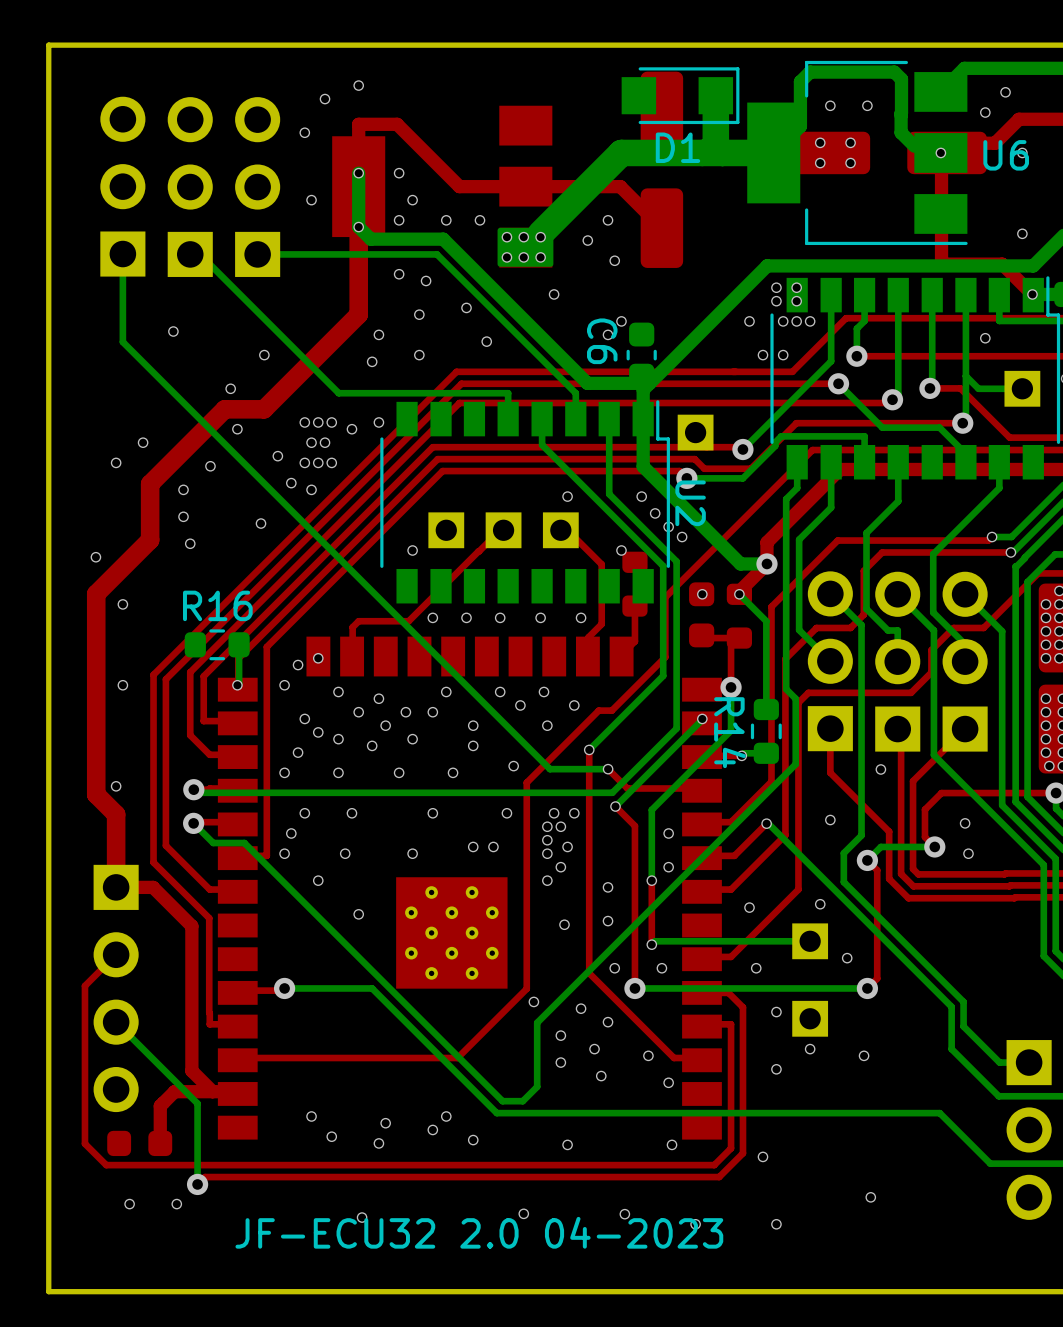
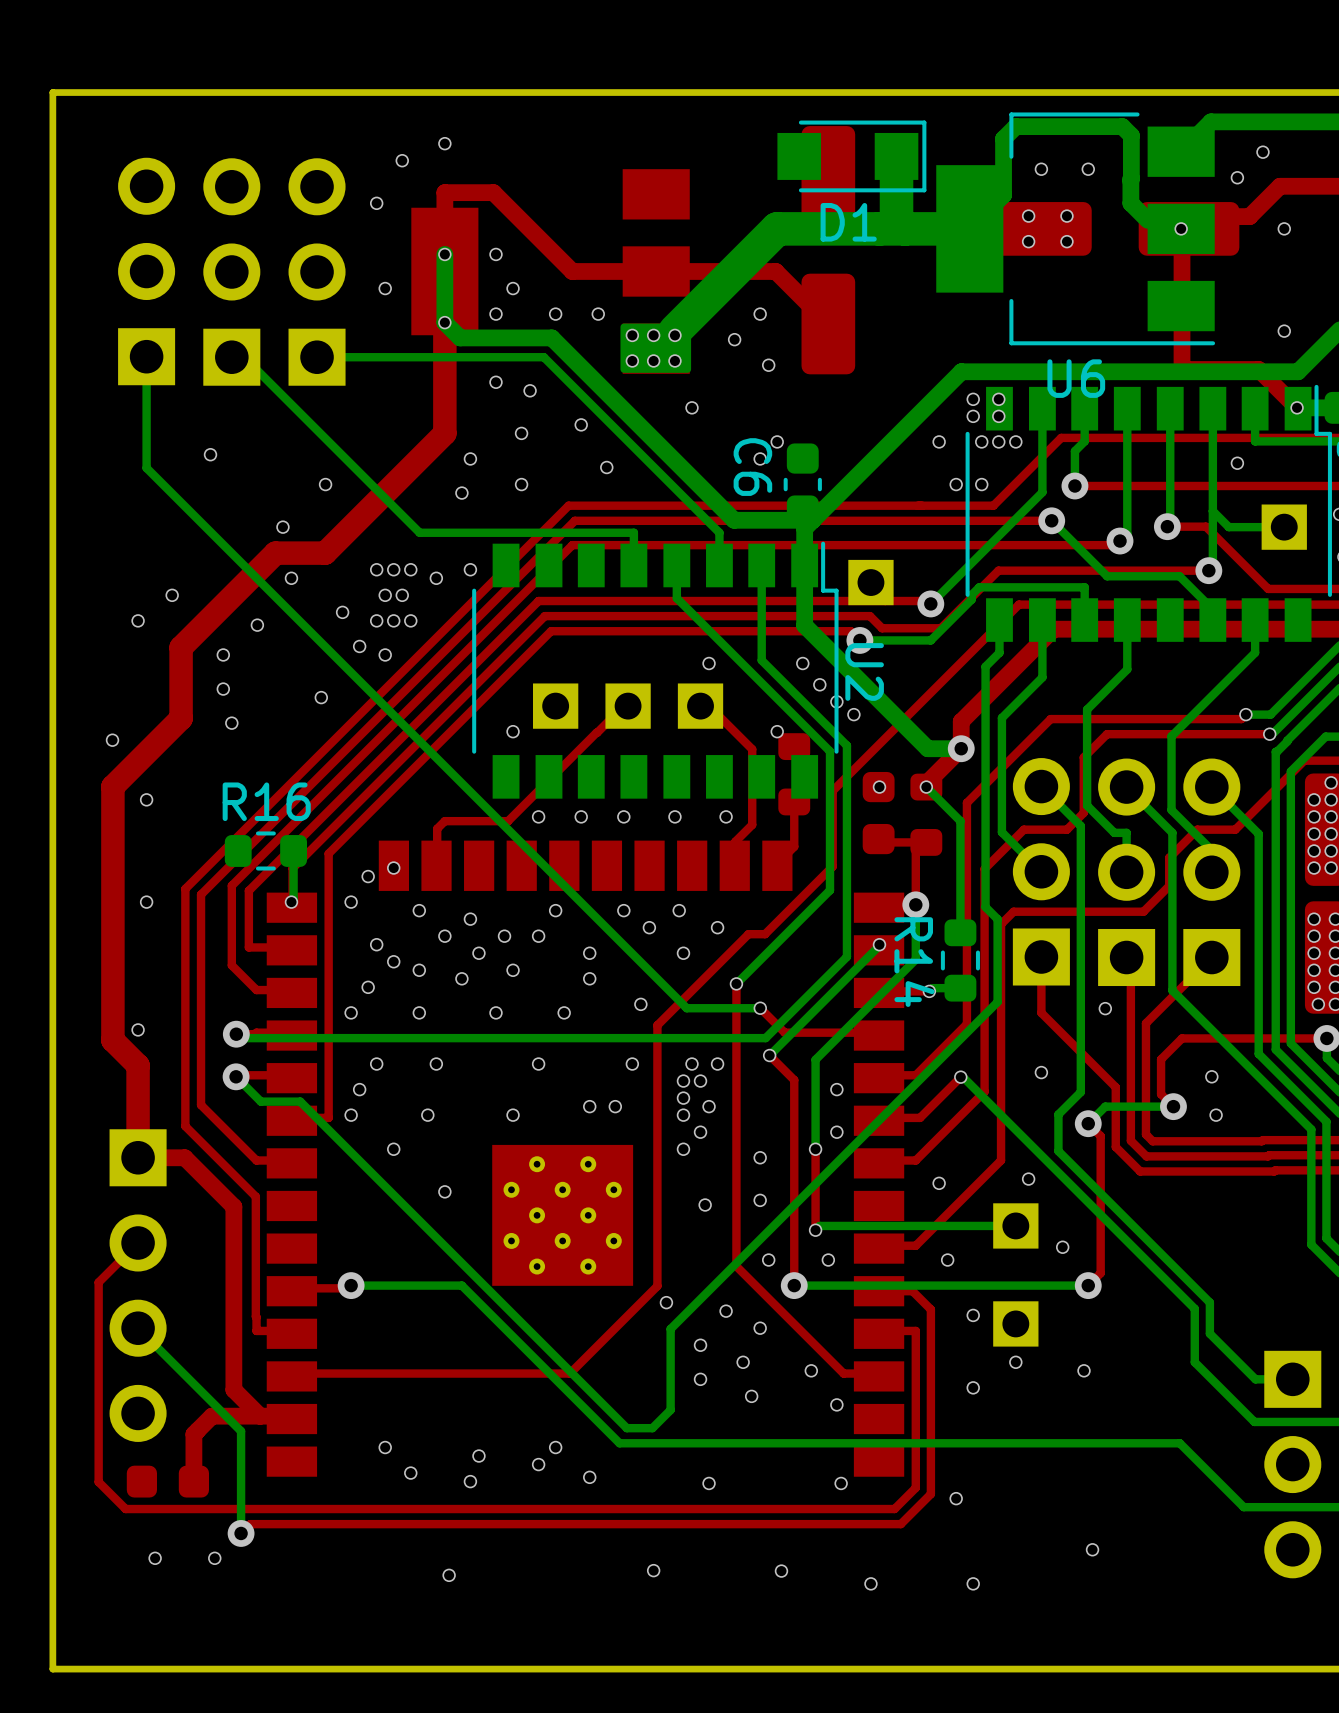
U6 name position: U6 (1006, 155) -> U6 (1076, 378)
text: JF-ECU32 2.0 04-2023 (479, 1232) -> none

